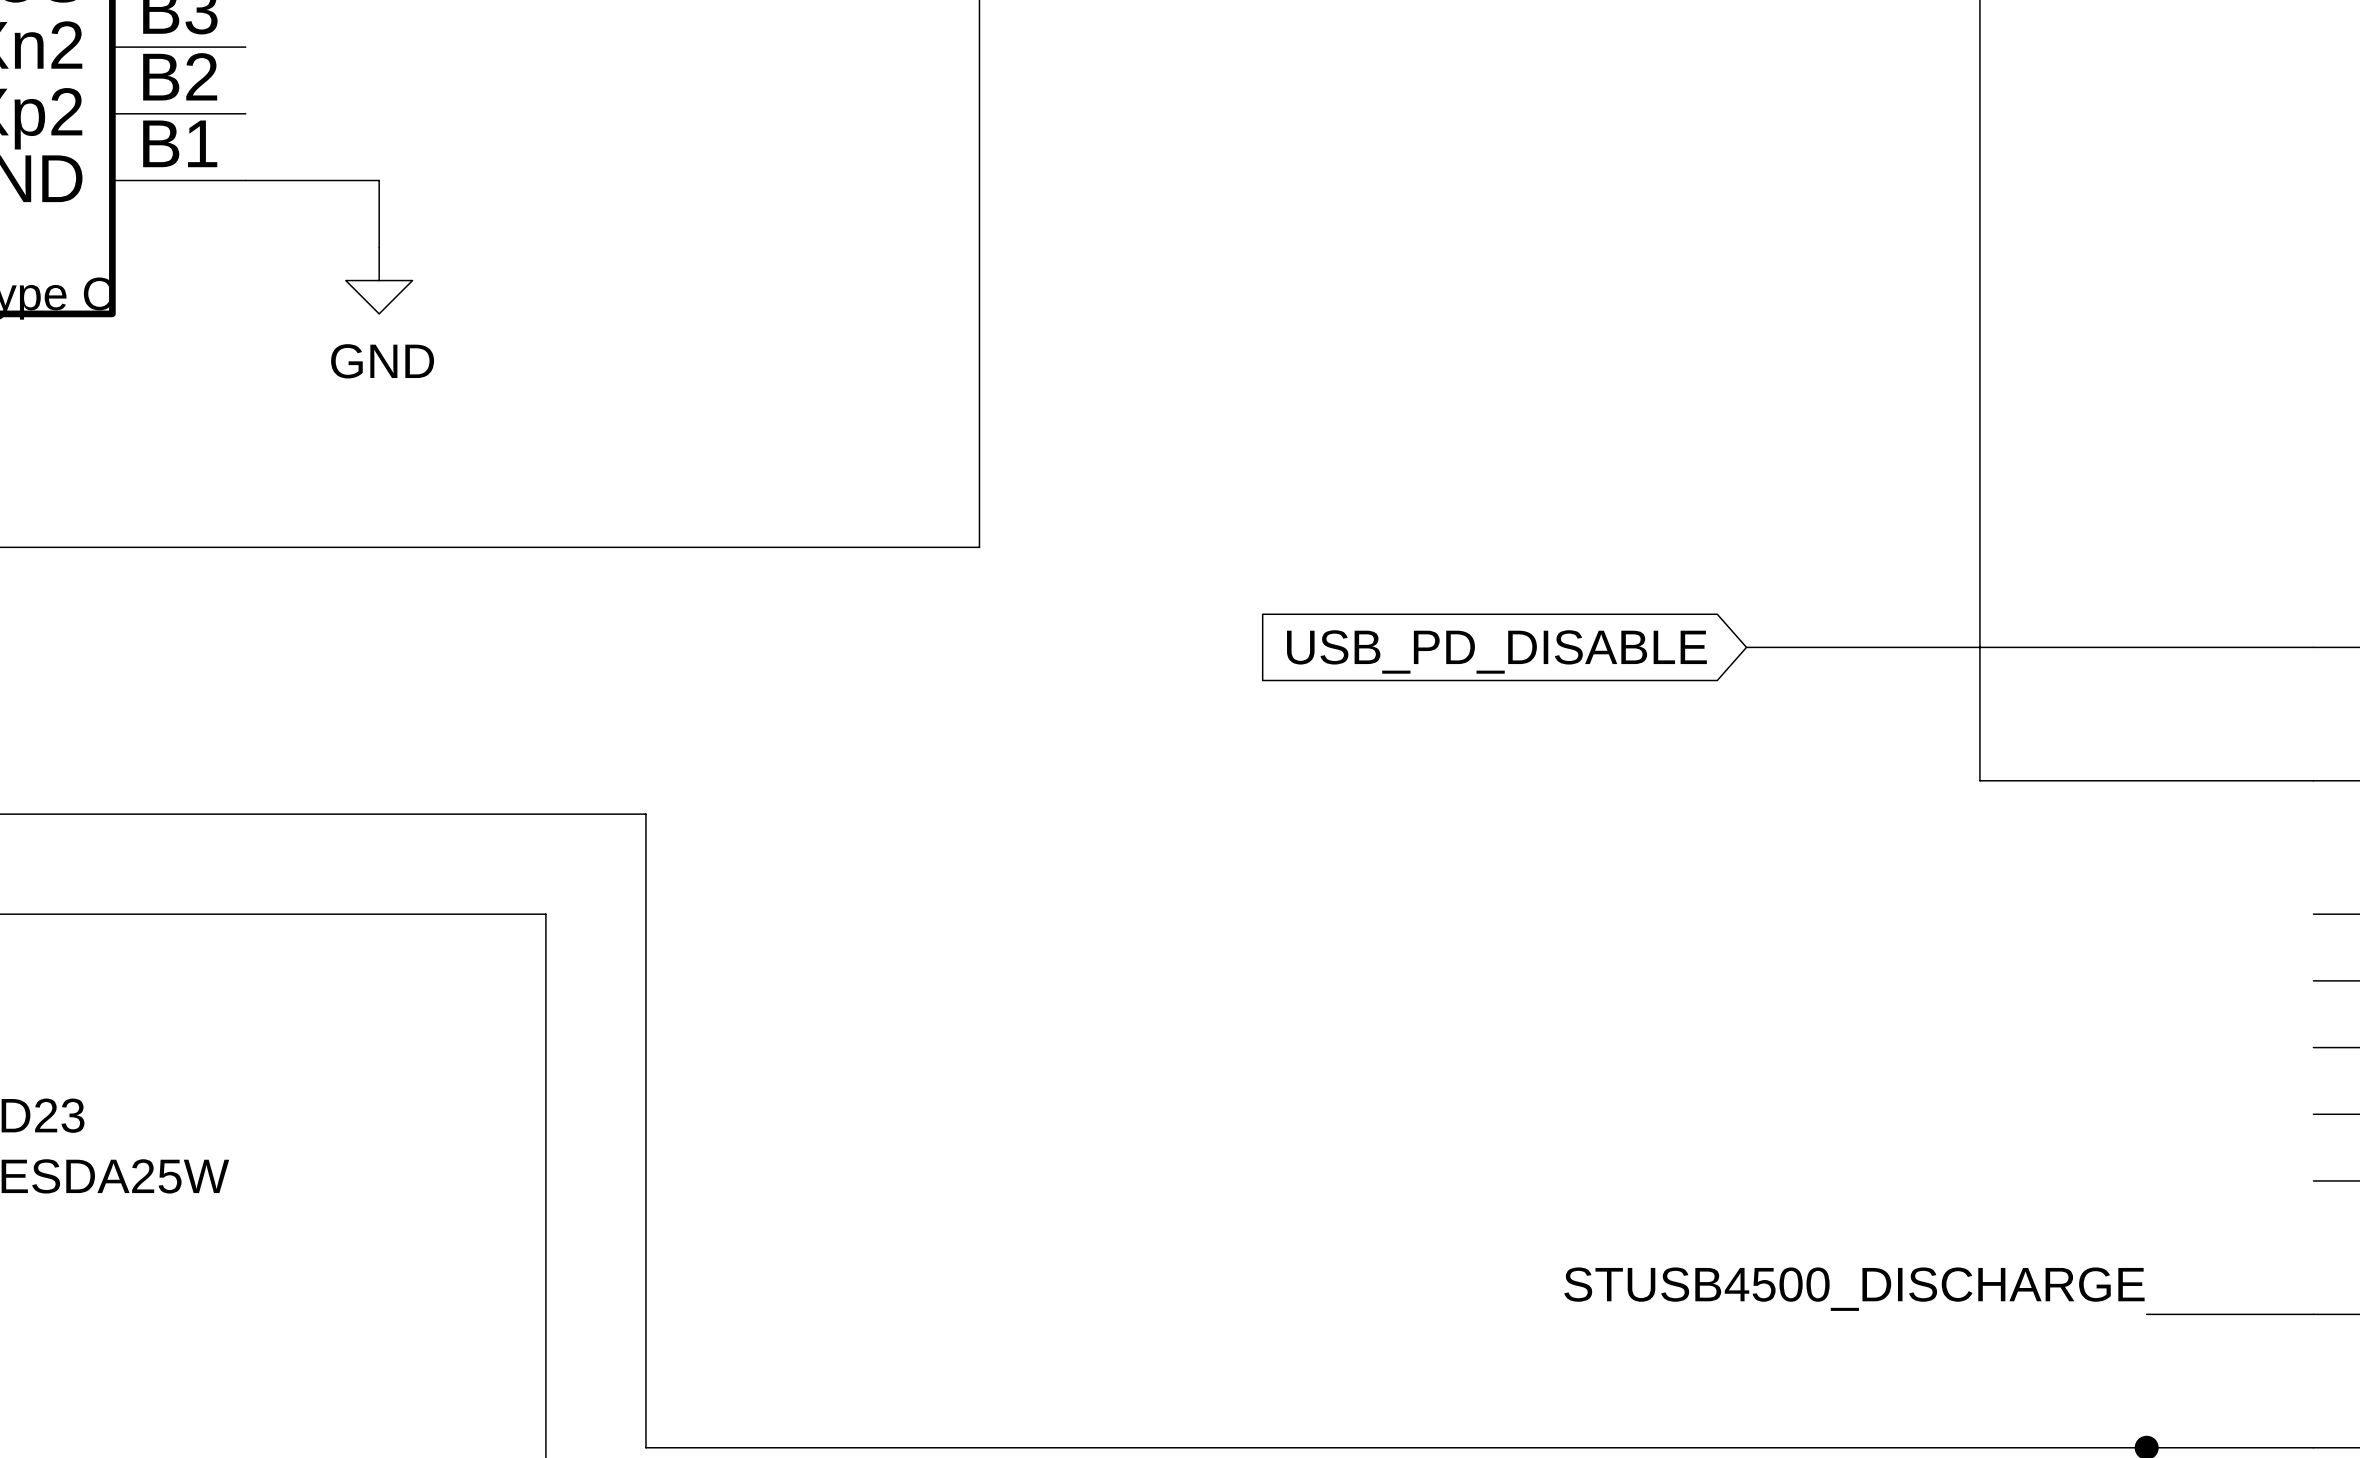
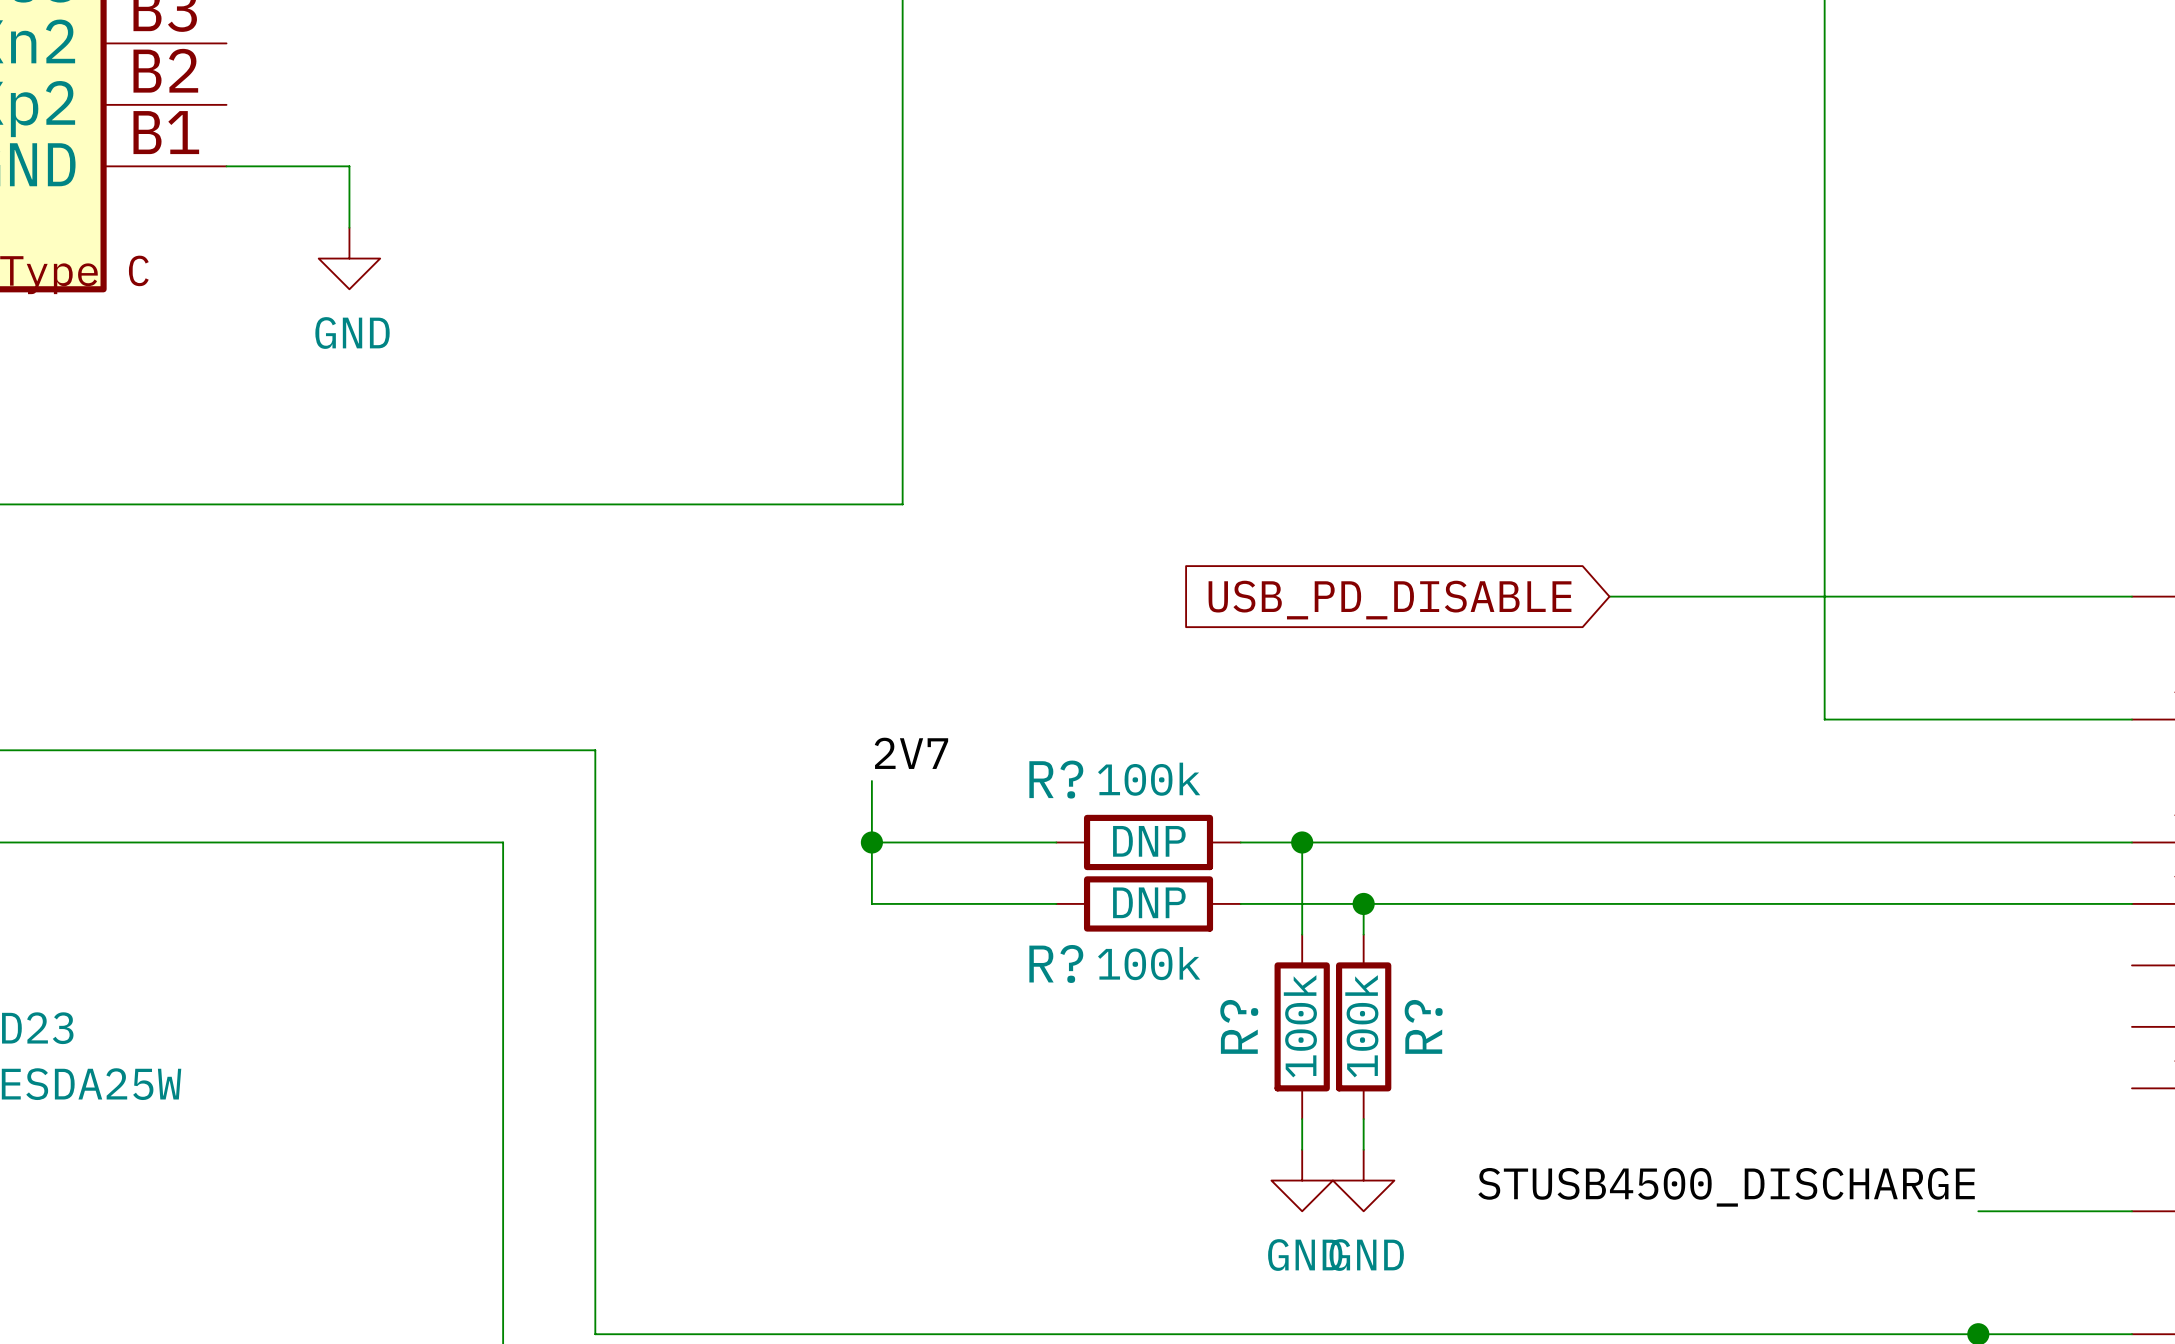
label: none -> 2V7 (911, 753)
wire: none -> (871, 781) (871, 903) (1056, 903)
wire: none -> (871, 842) (1056, 842)
junction: none -> (871, 842)
R?: none -> (1148, 842)
wire: none -> (1240, 842) (2131, 842)
wire: none -> (1302, 842) (1302, 934)
junction: none -> (1302, 842)
R?: none -> (1148, 903)
wire: none -> (1240, 903) (2131, 903)
wire: none -> (1363, 903) (1363, 934)
junction: none -> (1363, 903)
R?: none -> (1302, 1026)
R?: none -> (1363, 1026)
wire: none -> (1302, 1119) (1302, 1149)
wire: none -> (1363, 1119) (1363, 1149)
power symbol: none -> GND (1302, 1180)
power symbol: none -> GND (1363, 1180)

